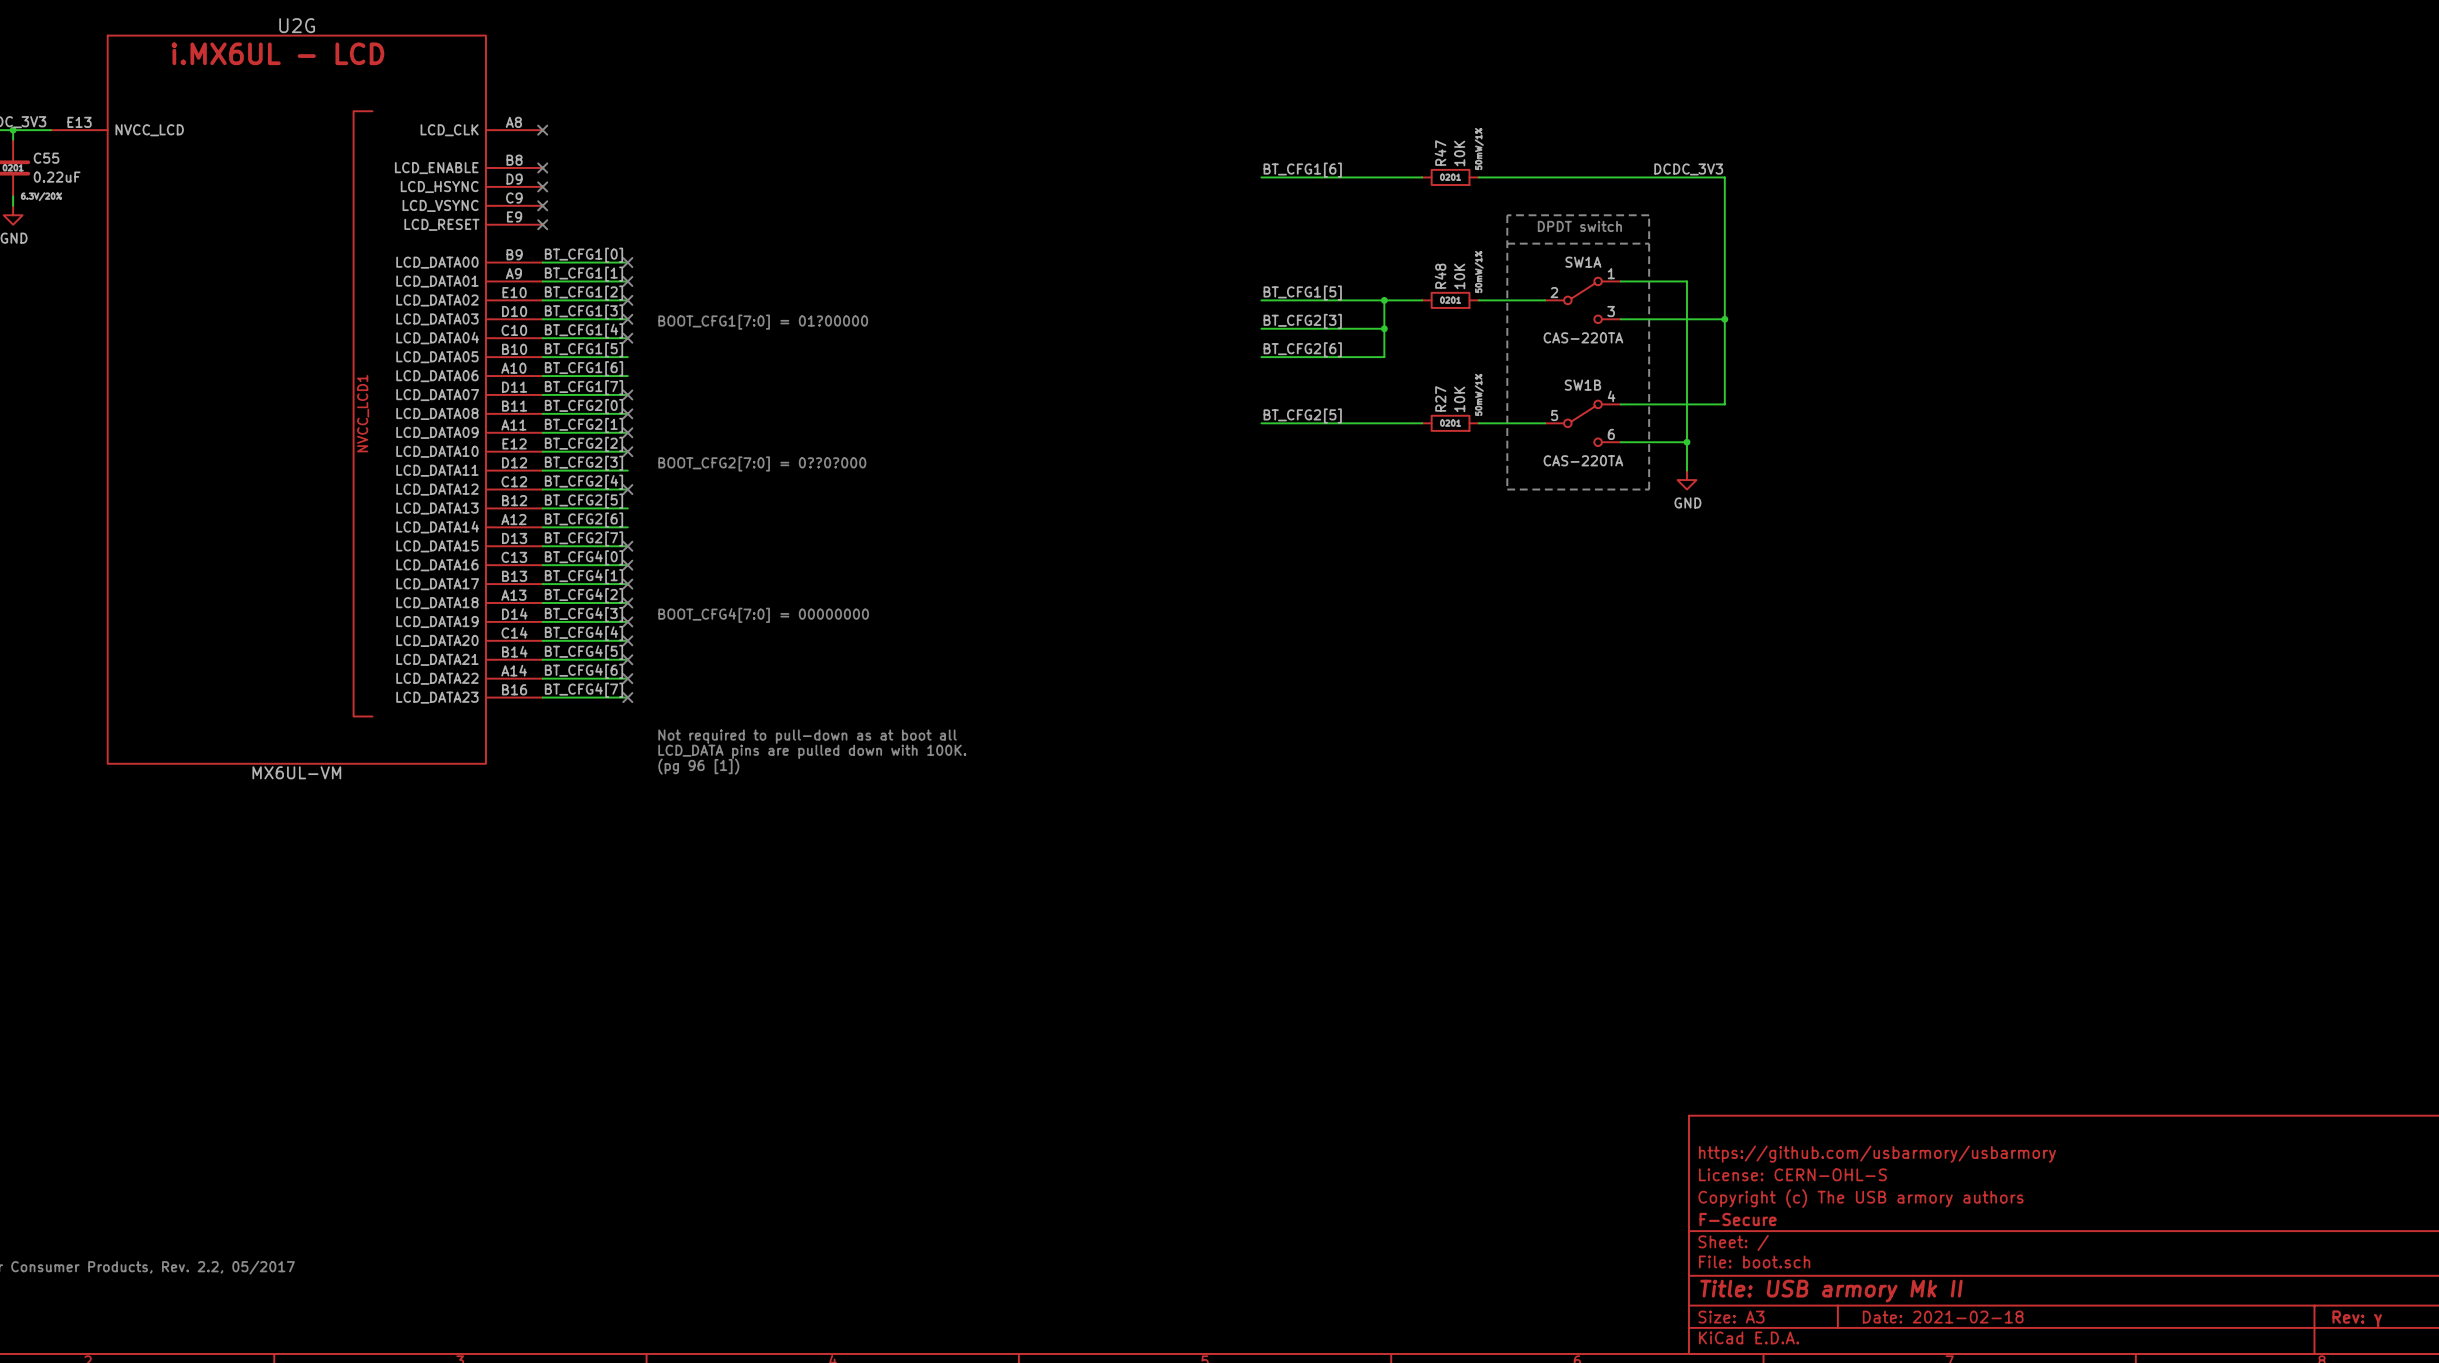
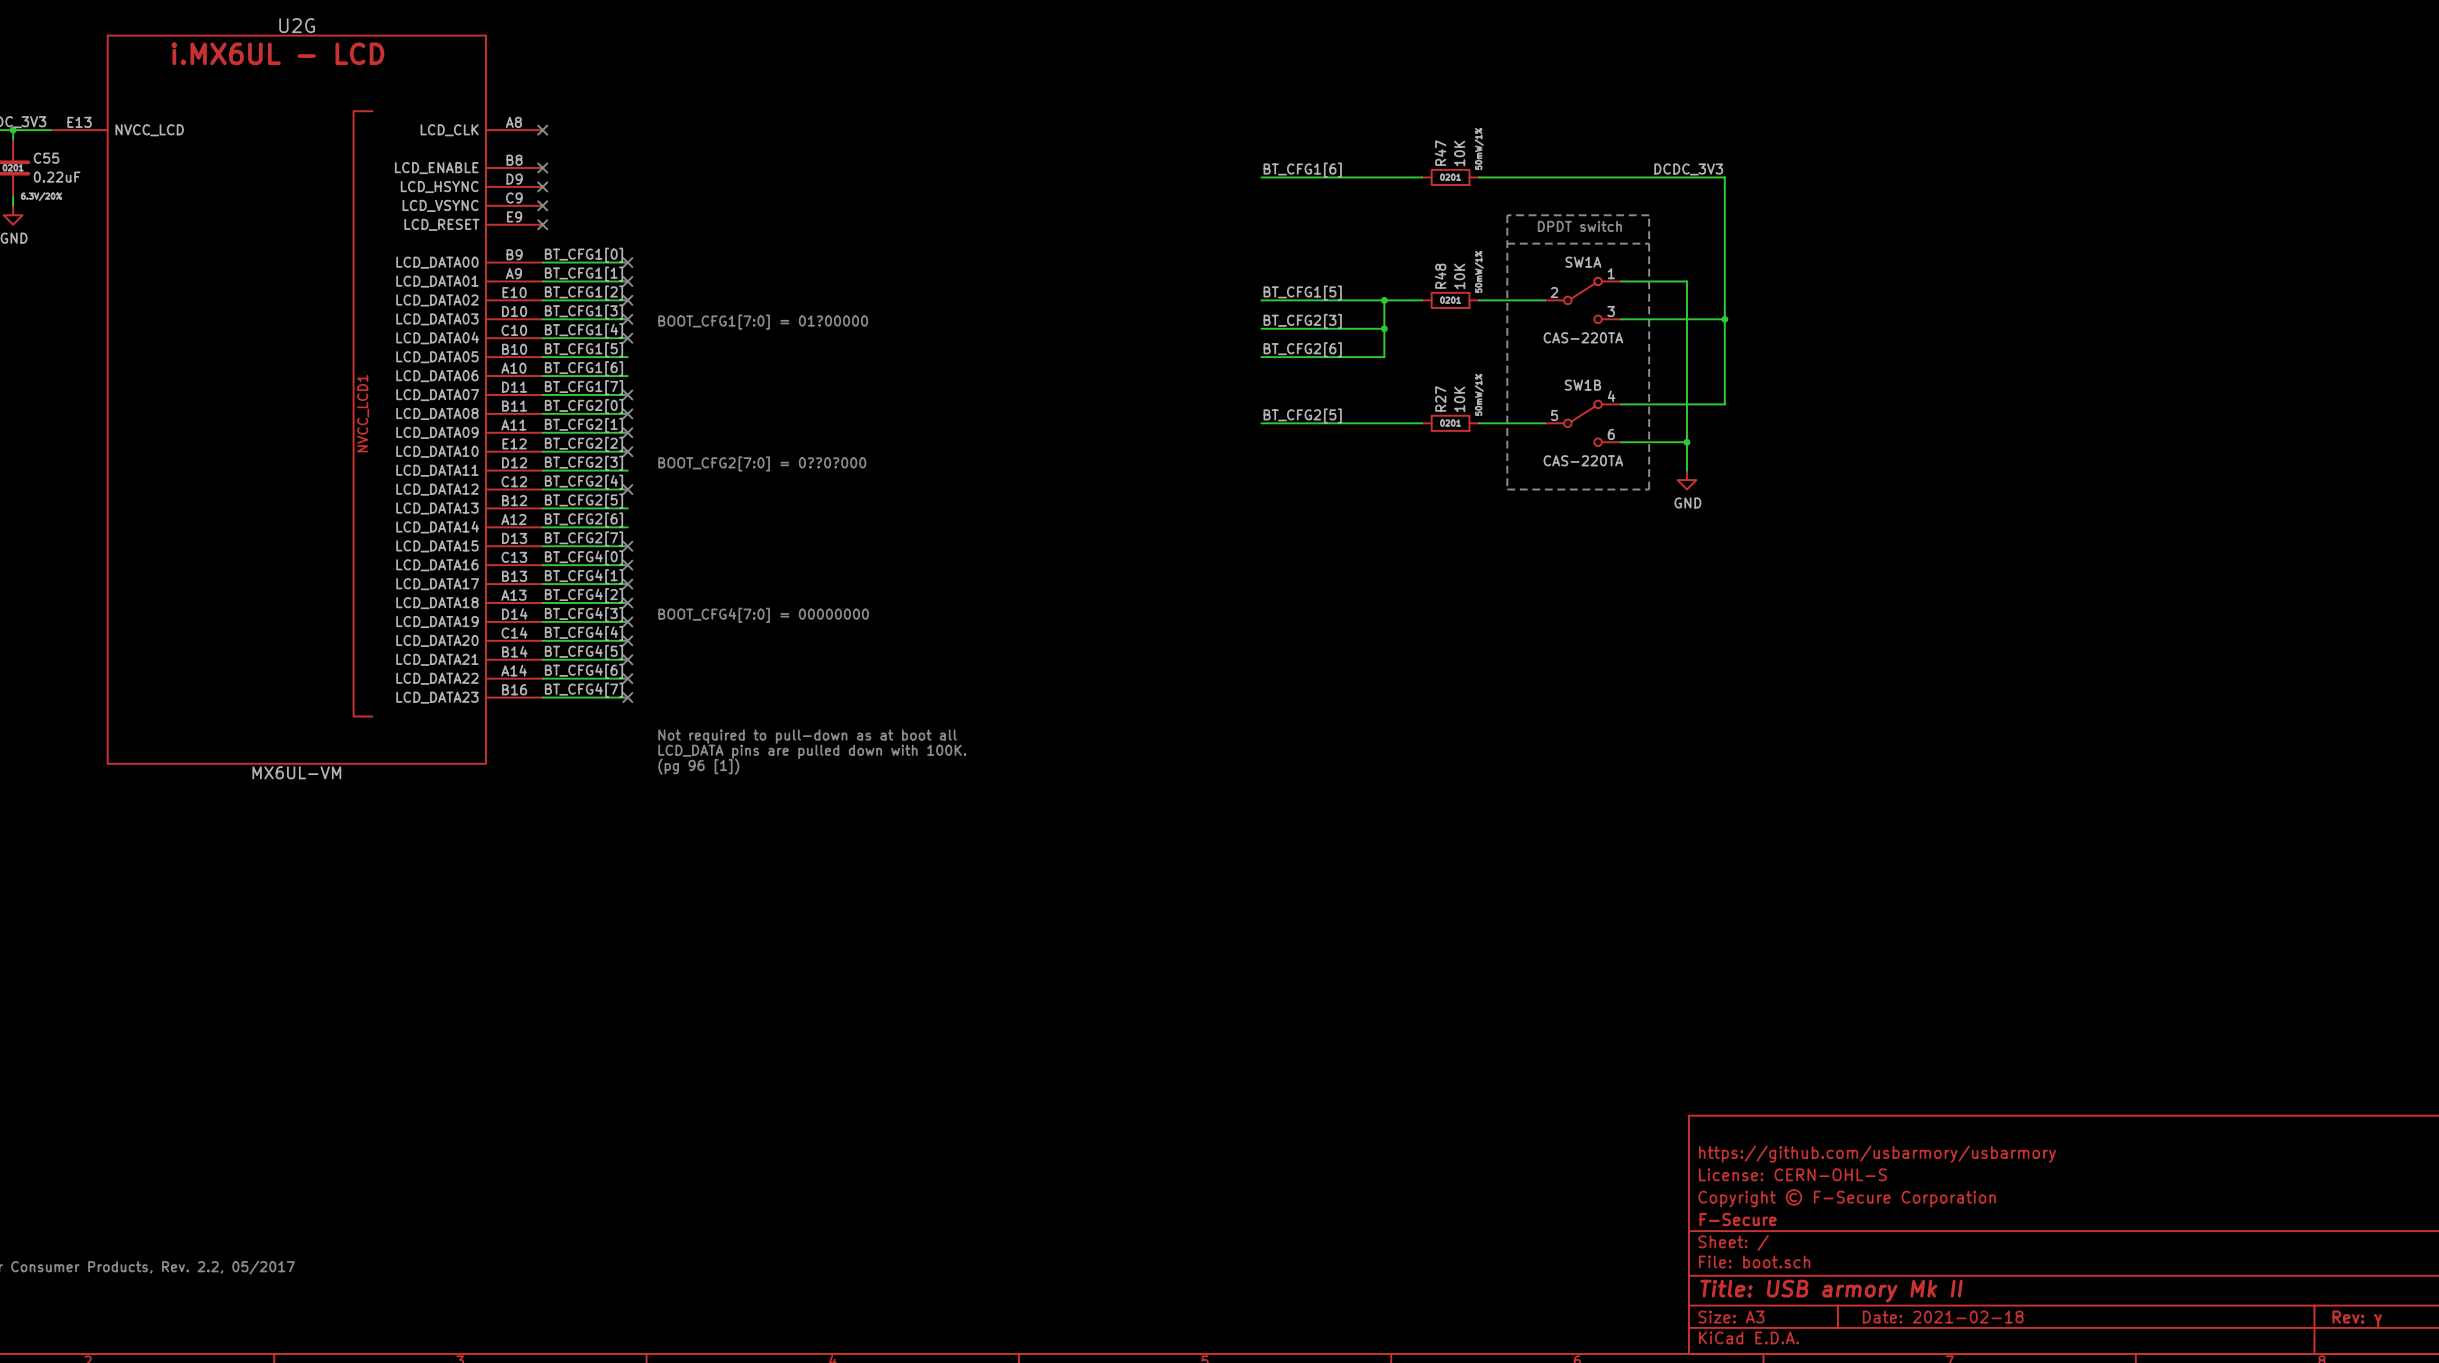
title block: Copyright (c) The USB armory authors (1861, 1198) -> Copyright © F-Secure Corporation (1847, 1198)

